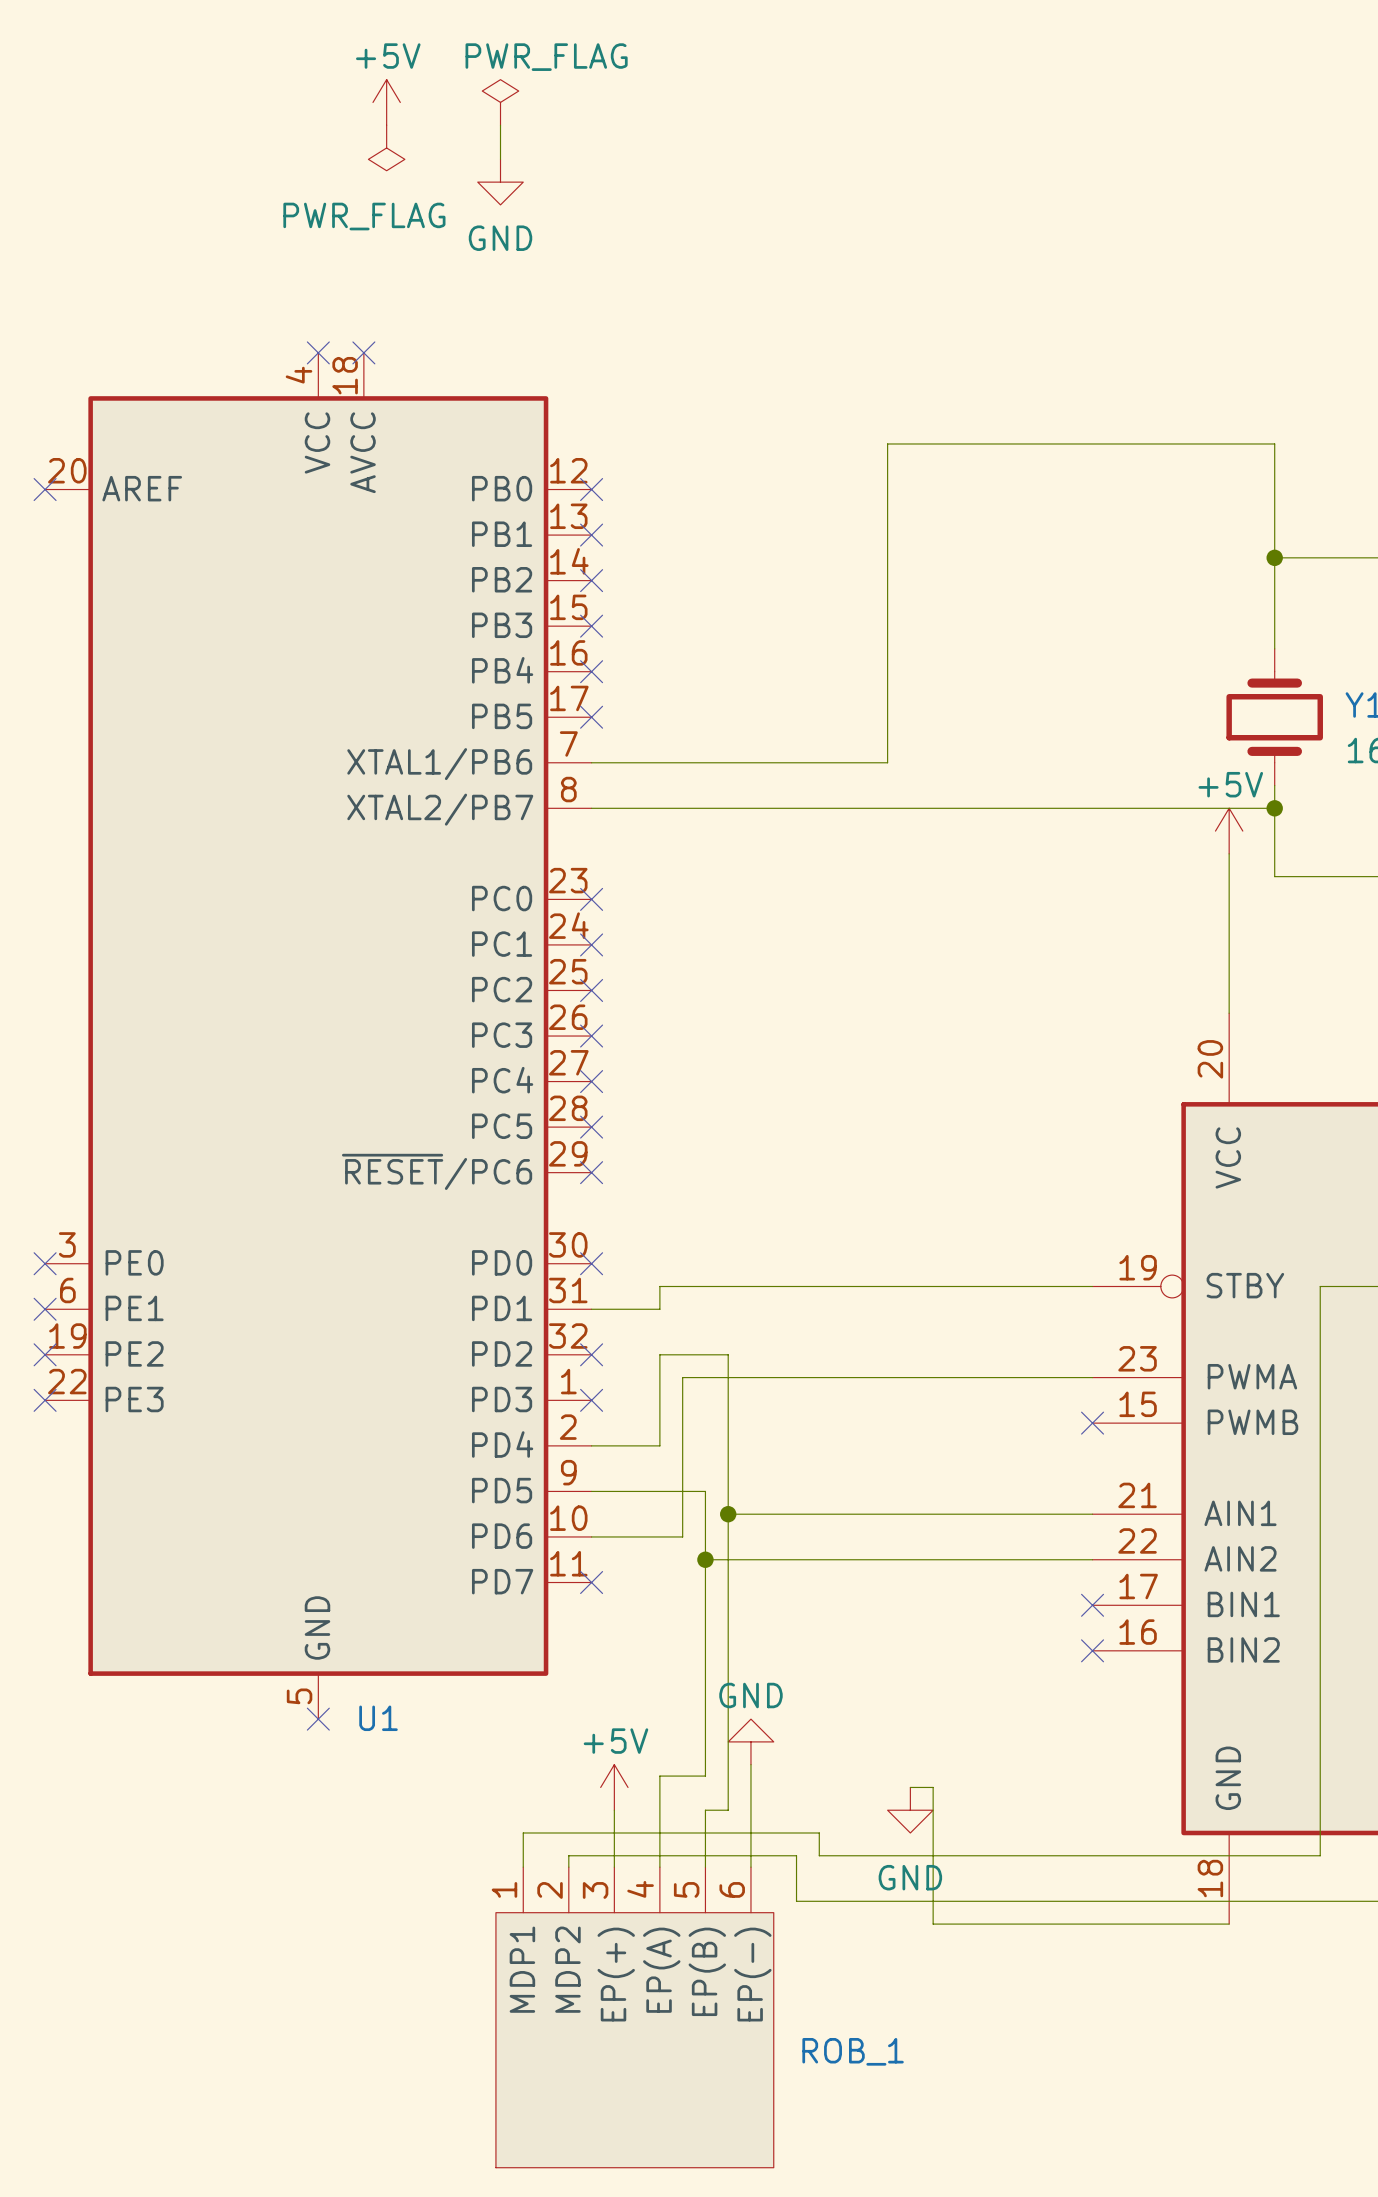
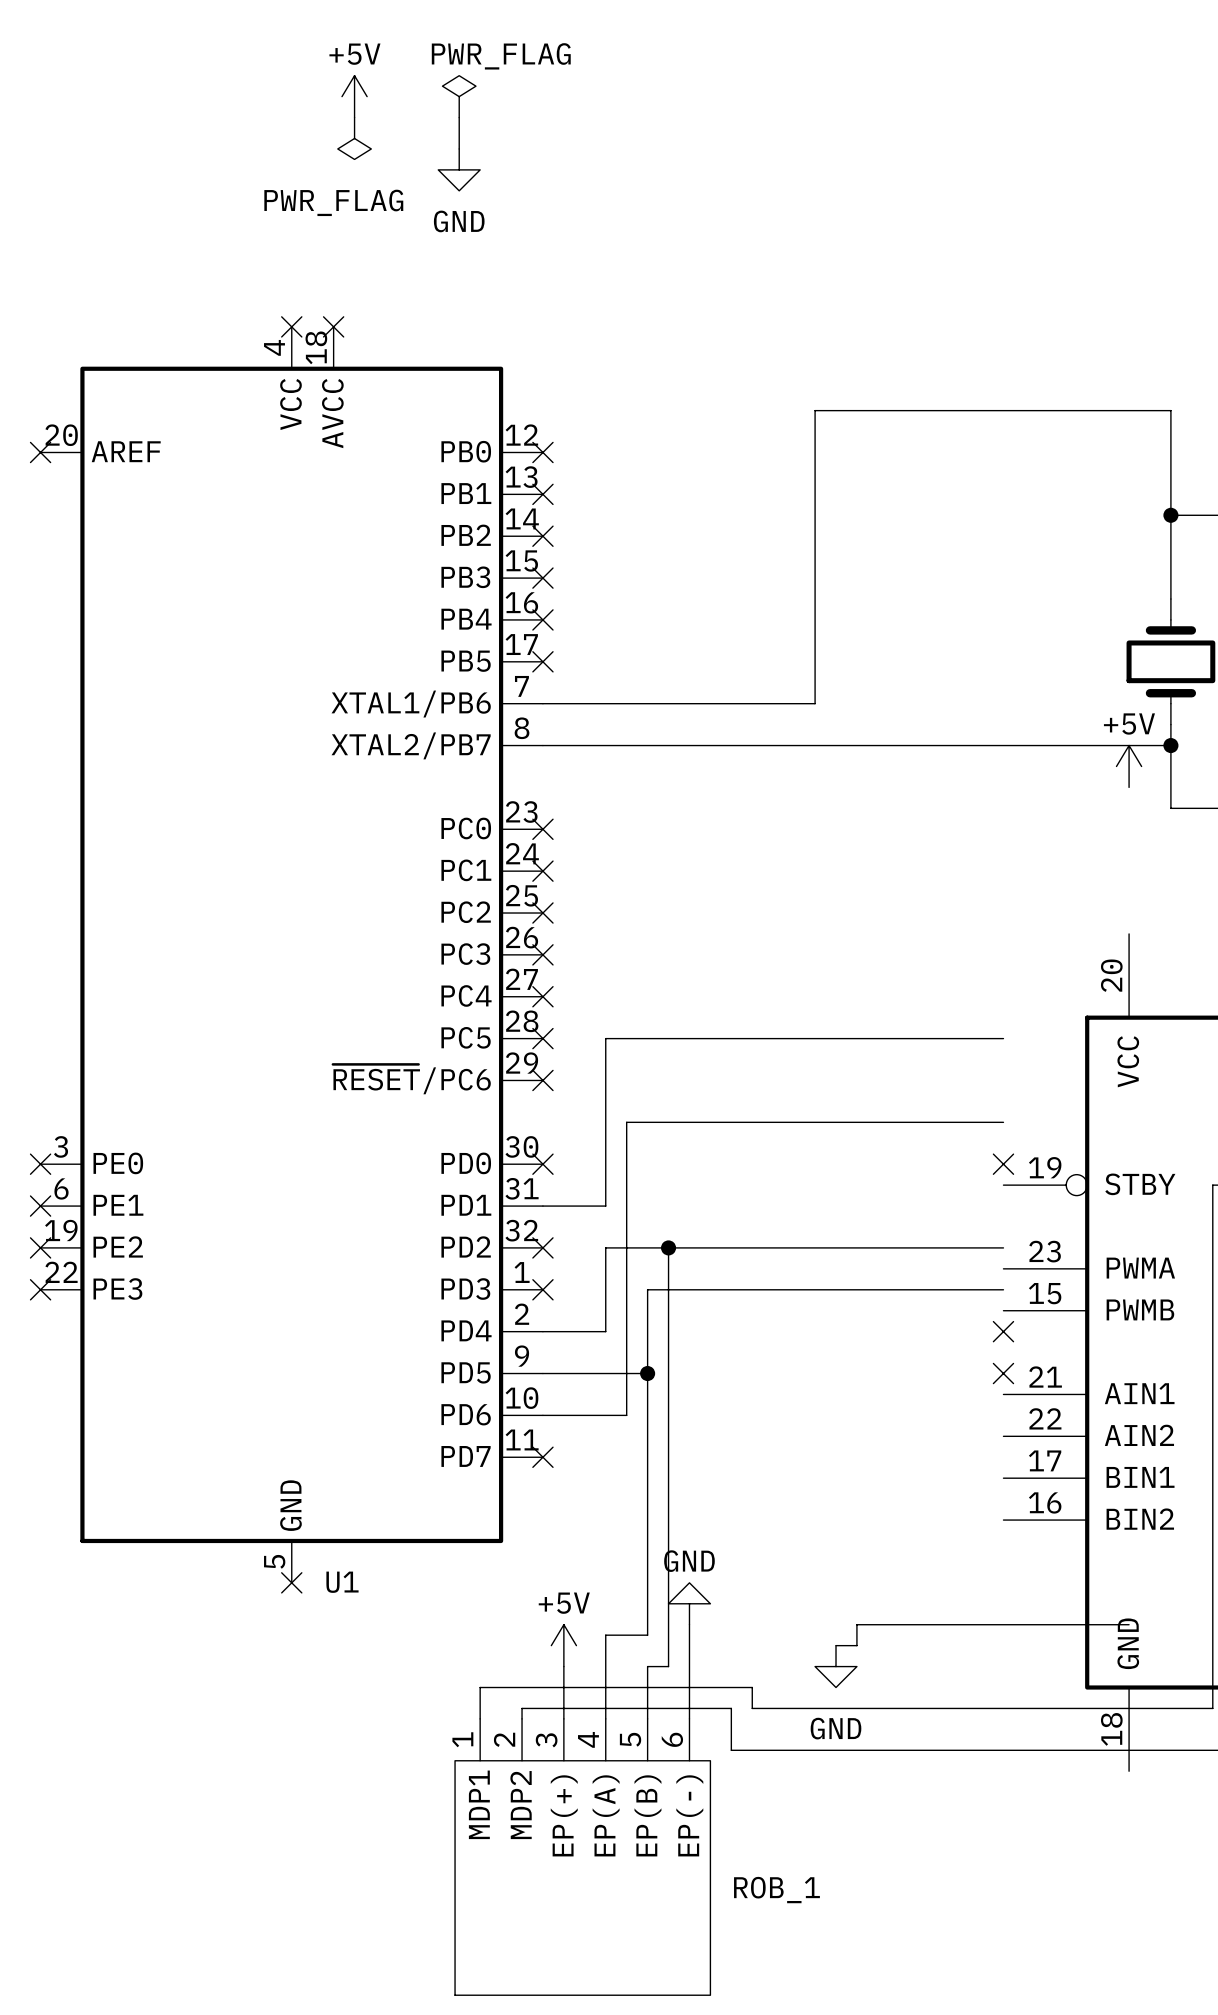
wire: (1229, 853) (1229, 1013) -> none
no-connect mark: none -> (1003, 1164)
wire: (659, 1286) (1092, 1286) -> (605, 1185) (605, 1038) (1003, 1038)
junction: none -> (668, 1247)
wire: (682, 1377) (1092, 1377) -> (626, 1268) (626, 1122) (1003, 1122)
wire: none -> (1003, 1289) (647, 1289) (647, 1373)
no-connect mark position: (1092, 1423) -> (1003, 1331)
no-connect mark: none -> (1003, 1373)
wire: (728, 1514) (1092, 1514) -> (668, 1247) (1003, 1247)
junction position: (728, 1514) -> (647, 1373)
wire: (705, 1559) (1092, 1559) -> none
junction: (705, 1559) -> none
no-connect mark: (1092, 1605) -> none
no-connect mark: (1092, 1650) -> none
wire: (933, 1787) (933, 1924) (1229, 1924) -> (856, 1645) (856, 1624) (1129, 1624)

